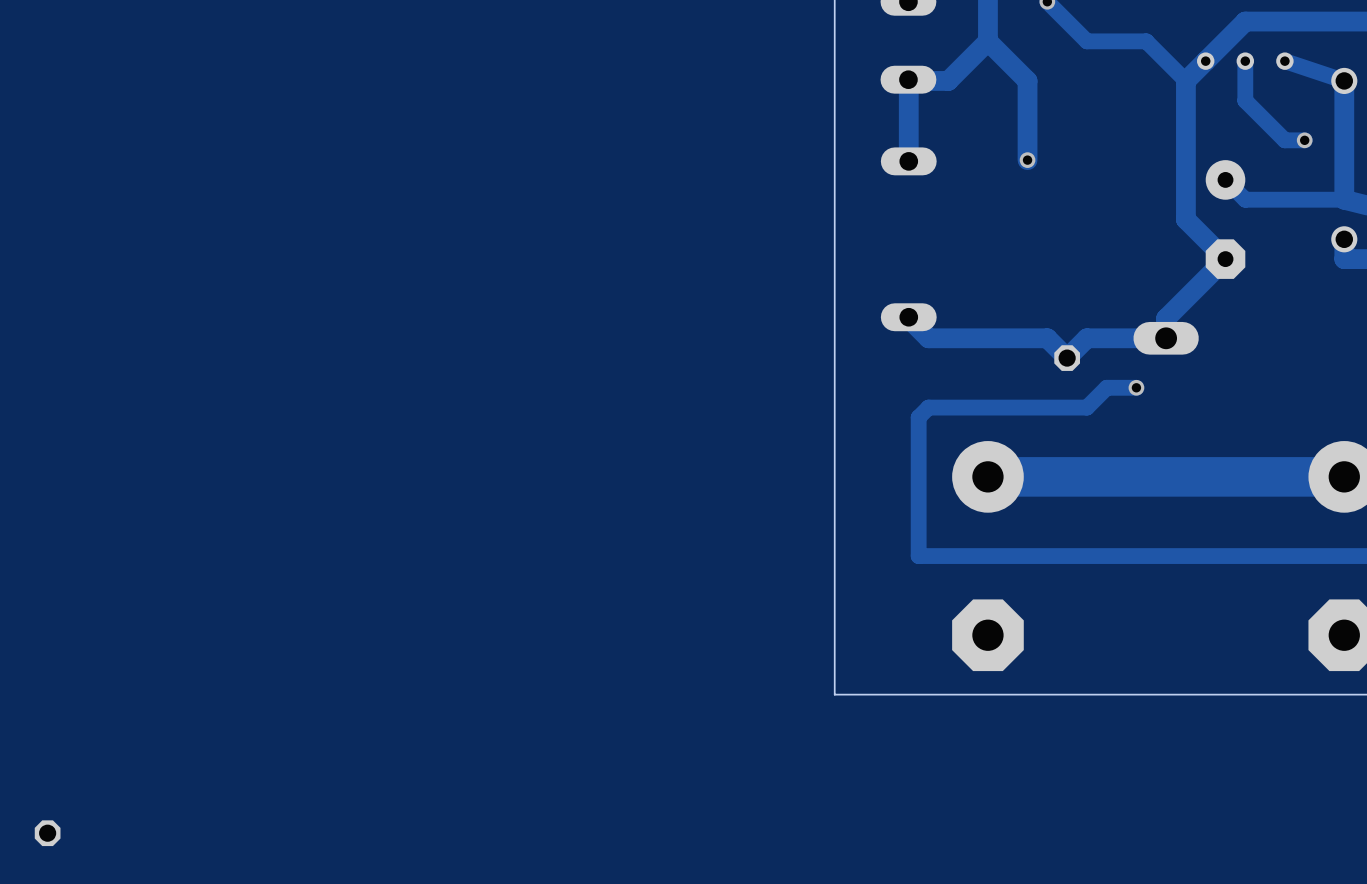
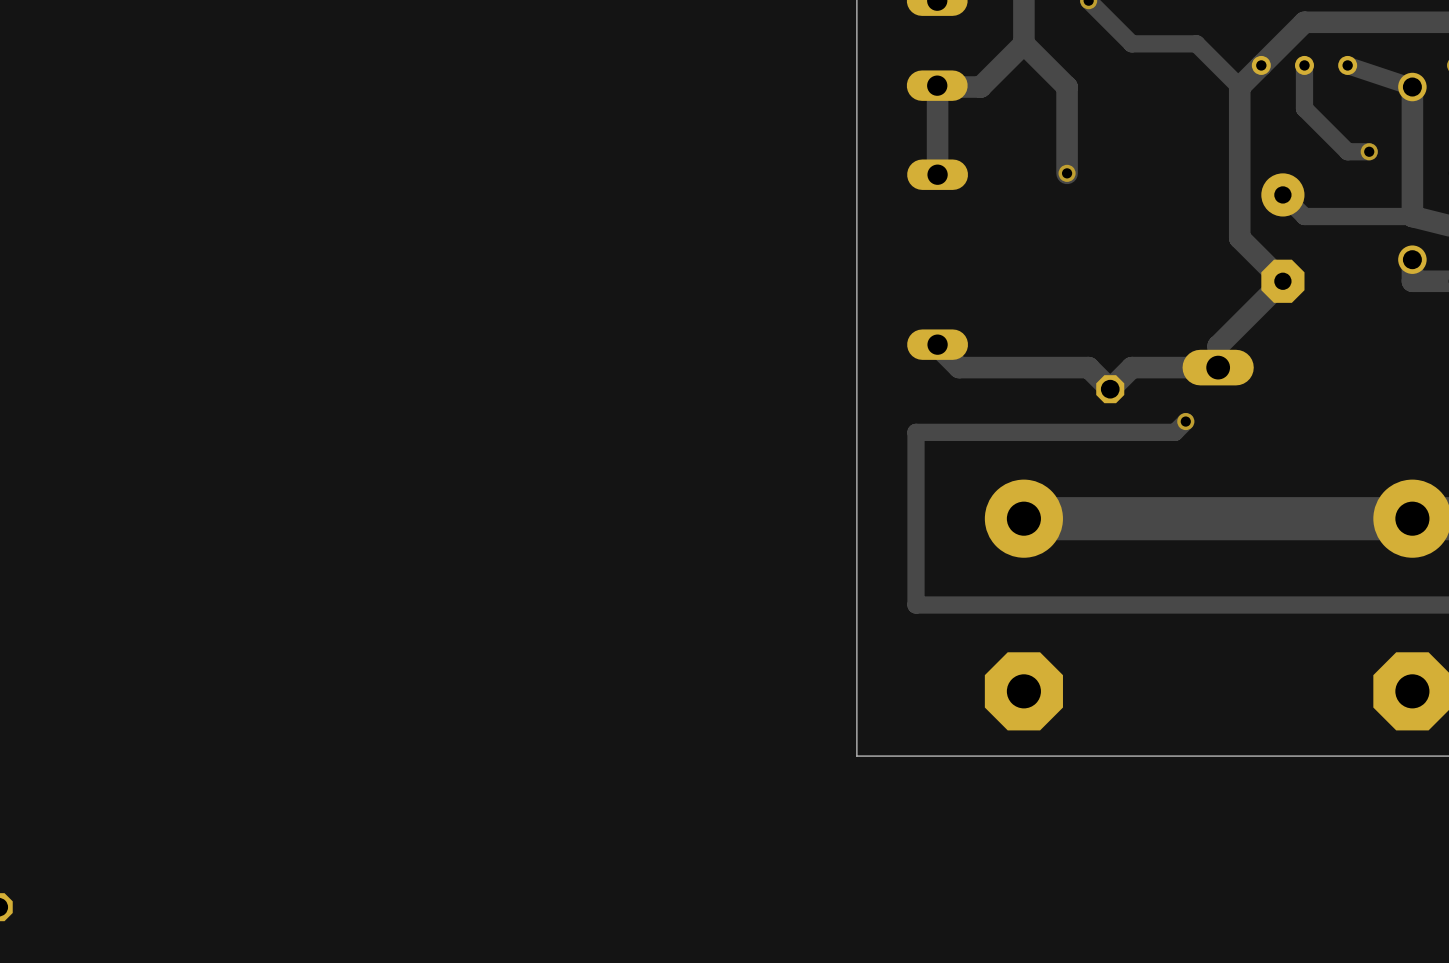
track: (1136, 387) (1106, 387) (1086, 407) (928, 407) (918, 417) (918, 556) -> (1185, 421) (1174, 432) (916, 432) (916, 605) (948, 605)

